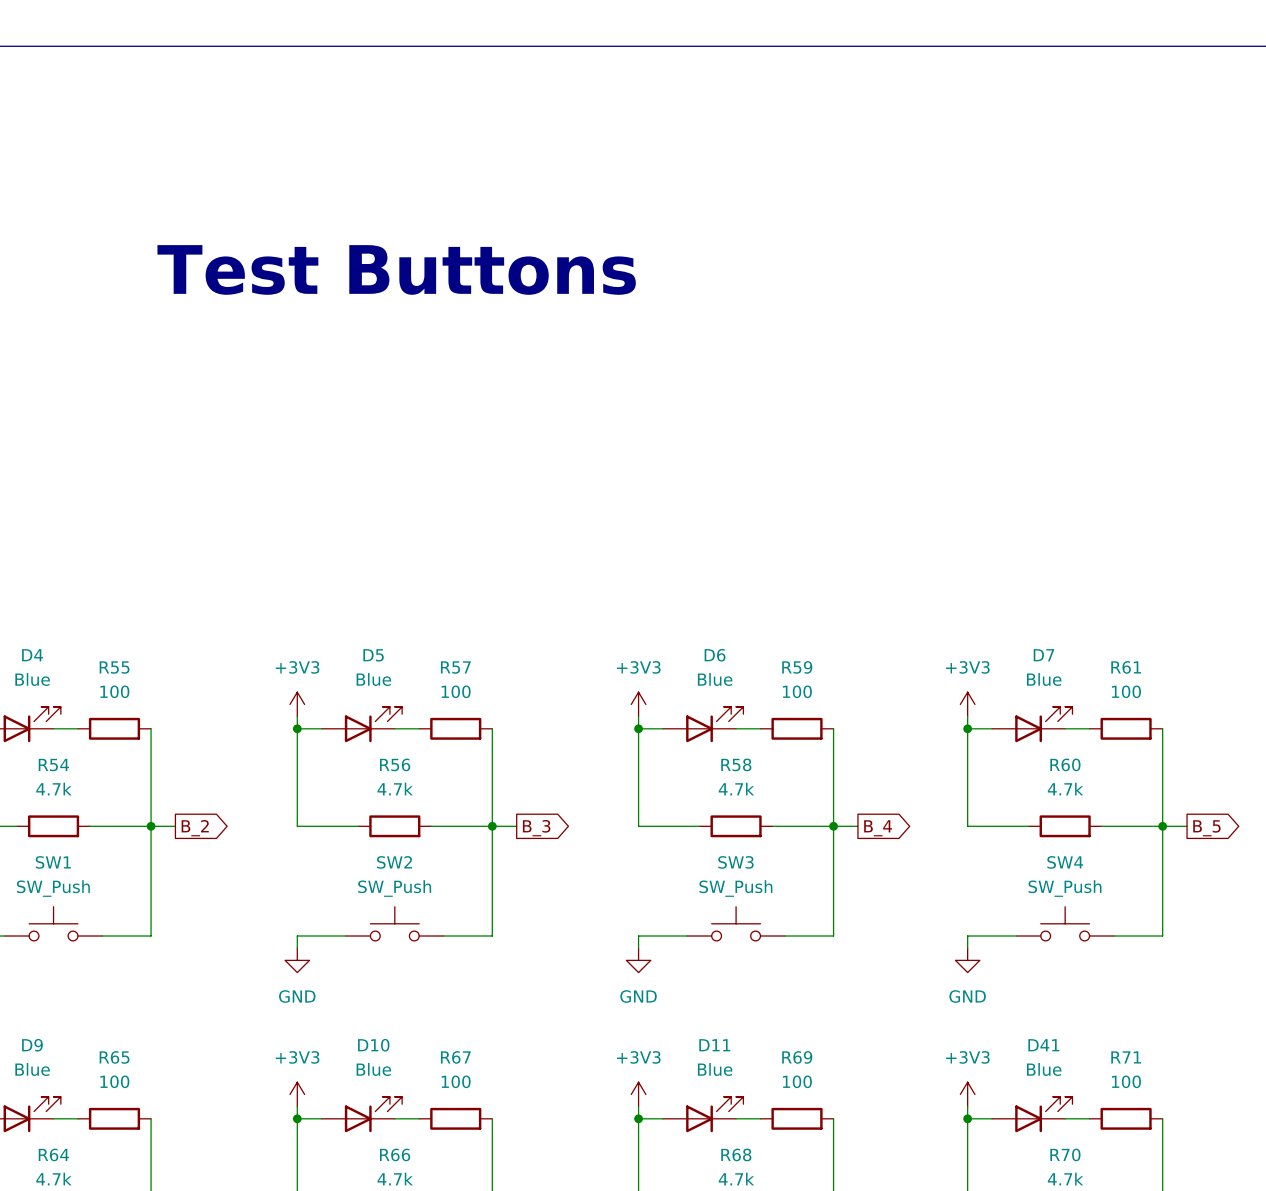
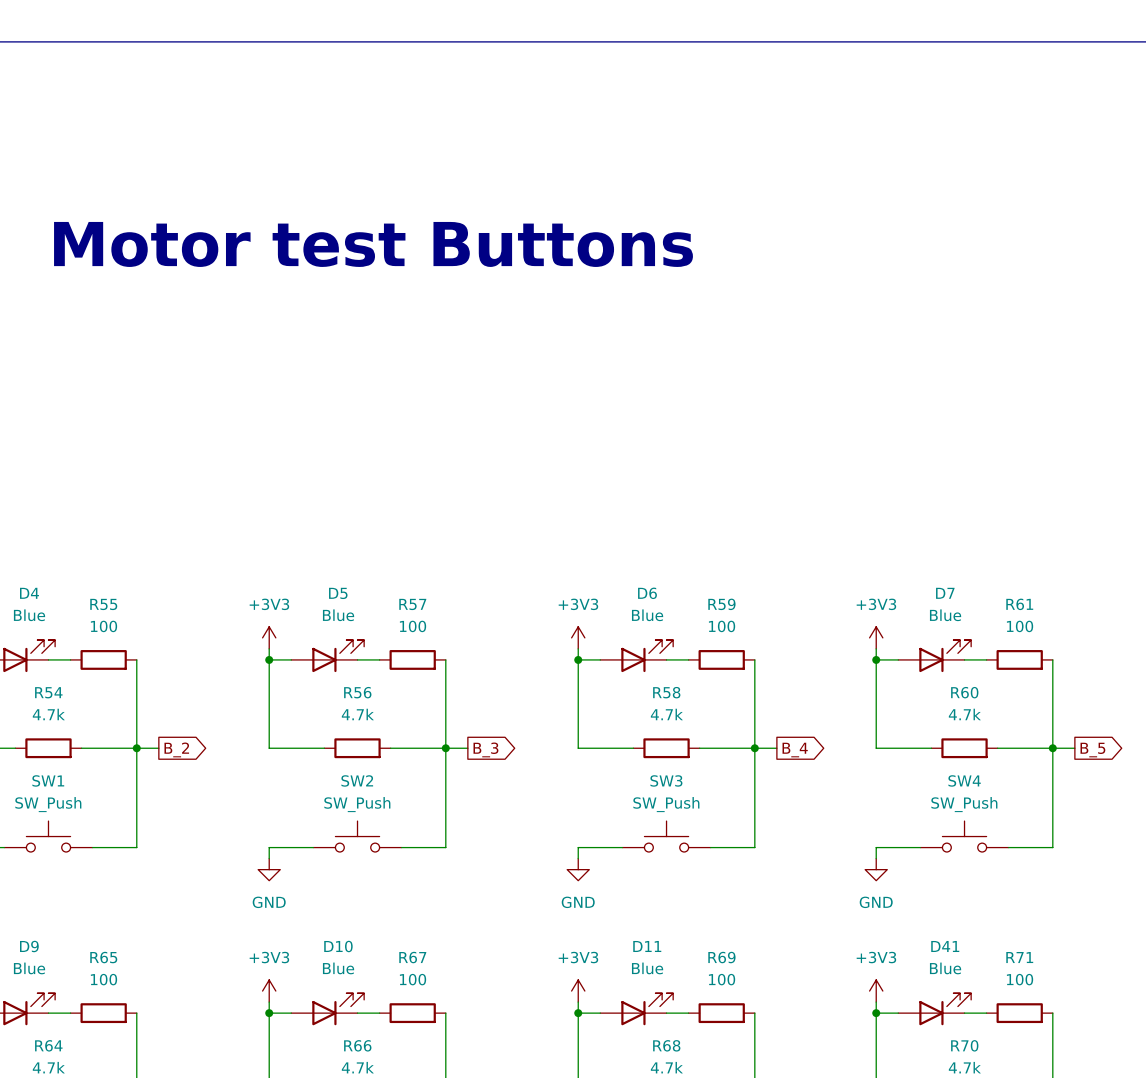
text: Test Buttons (396, 269) -> Motor test Buttons (373, 244)

